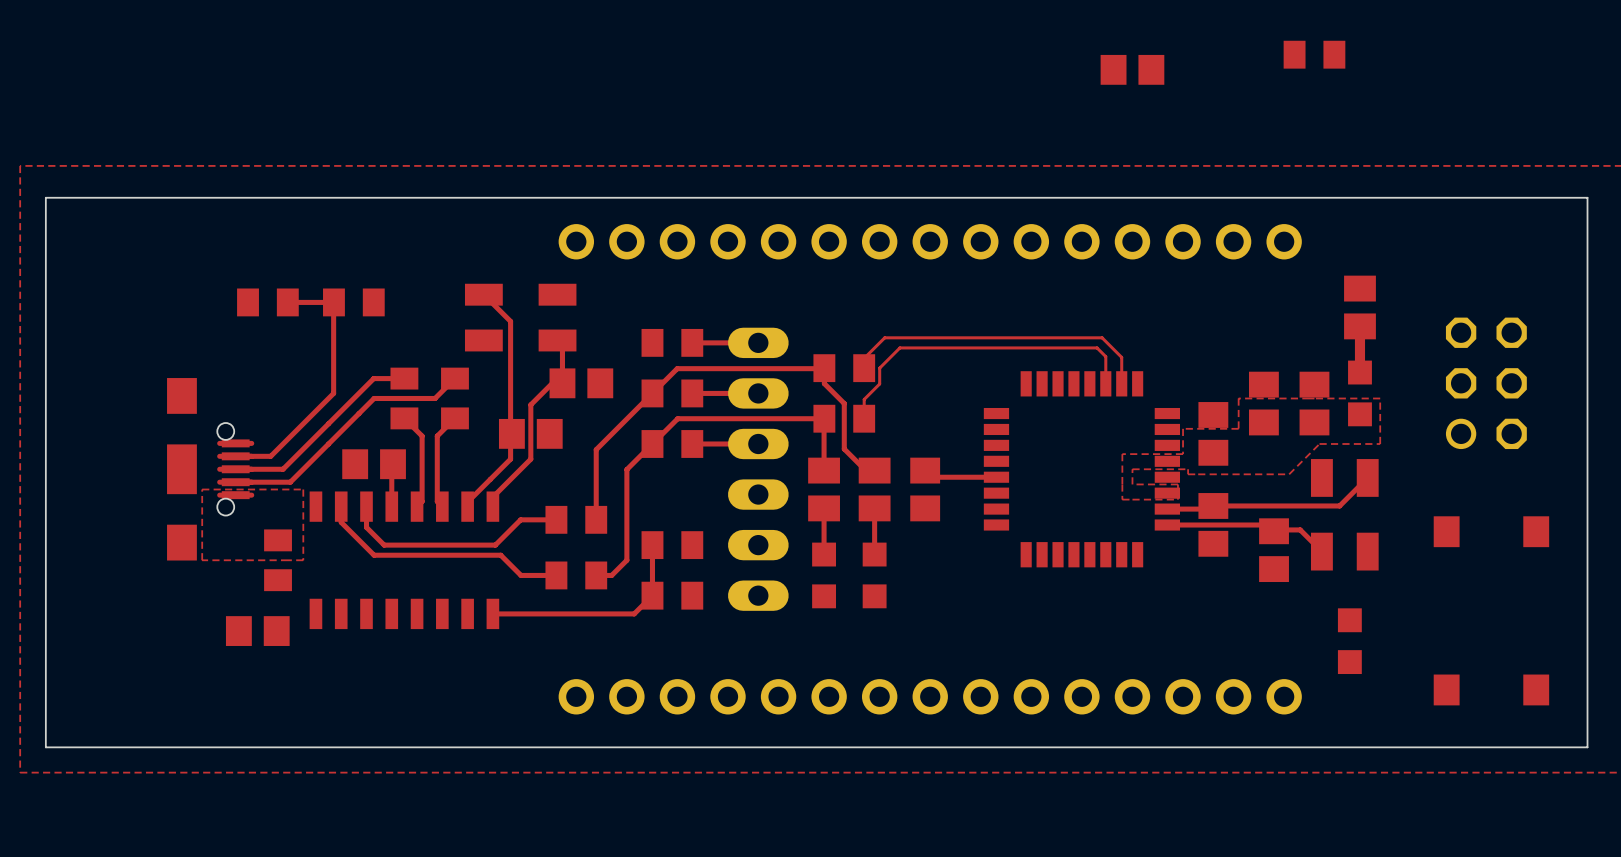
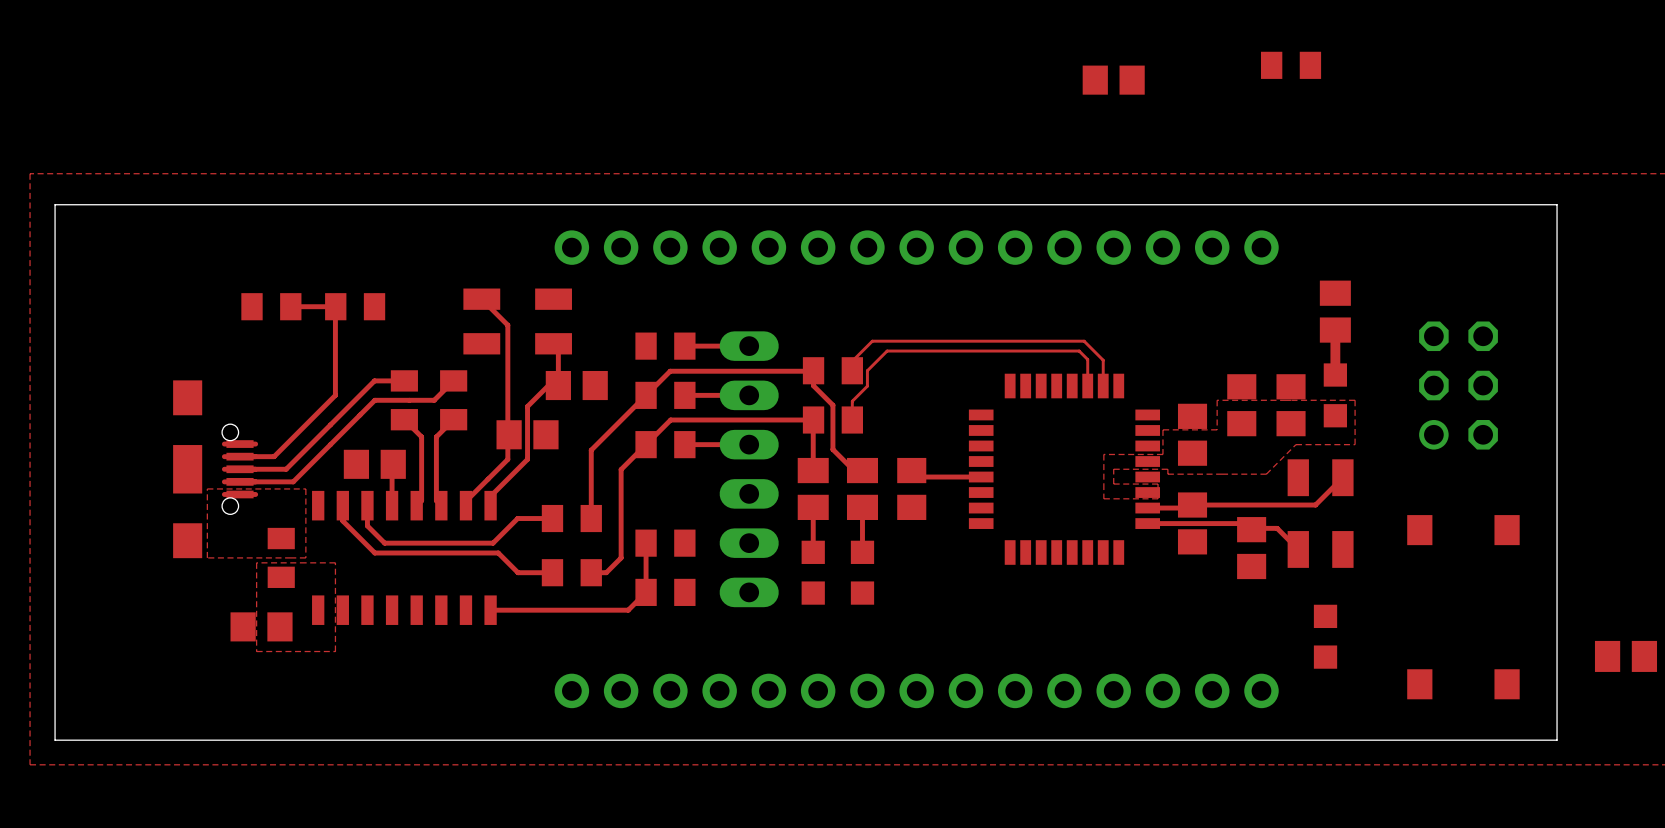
top zone outline: none -> (335, 562) (256, 562) (256, 651) (335, 651) (335, 562)

